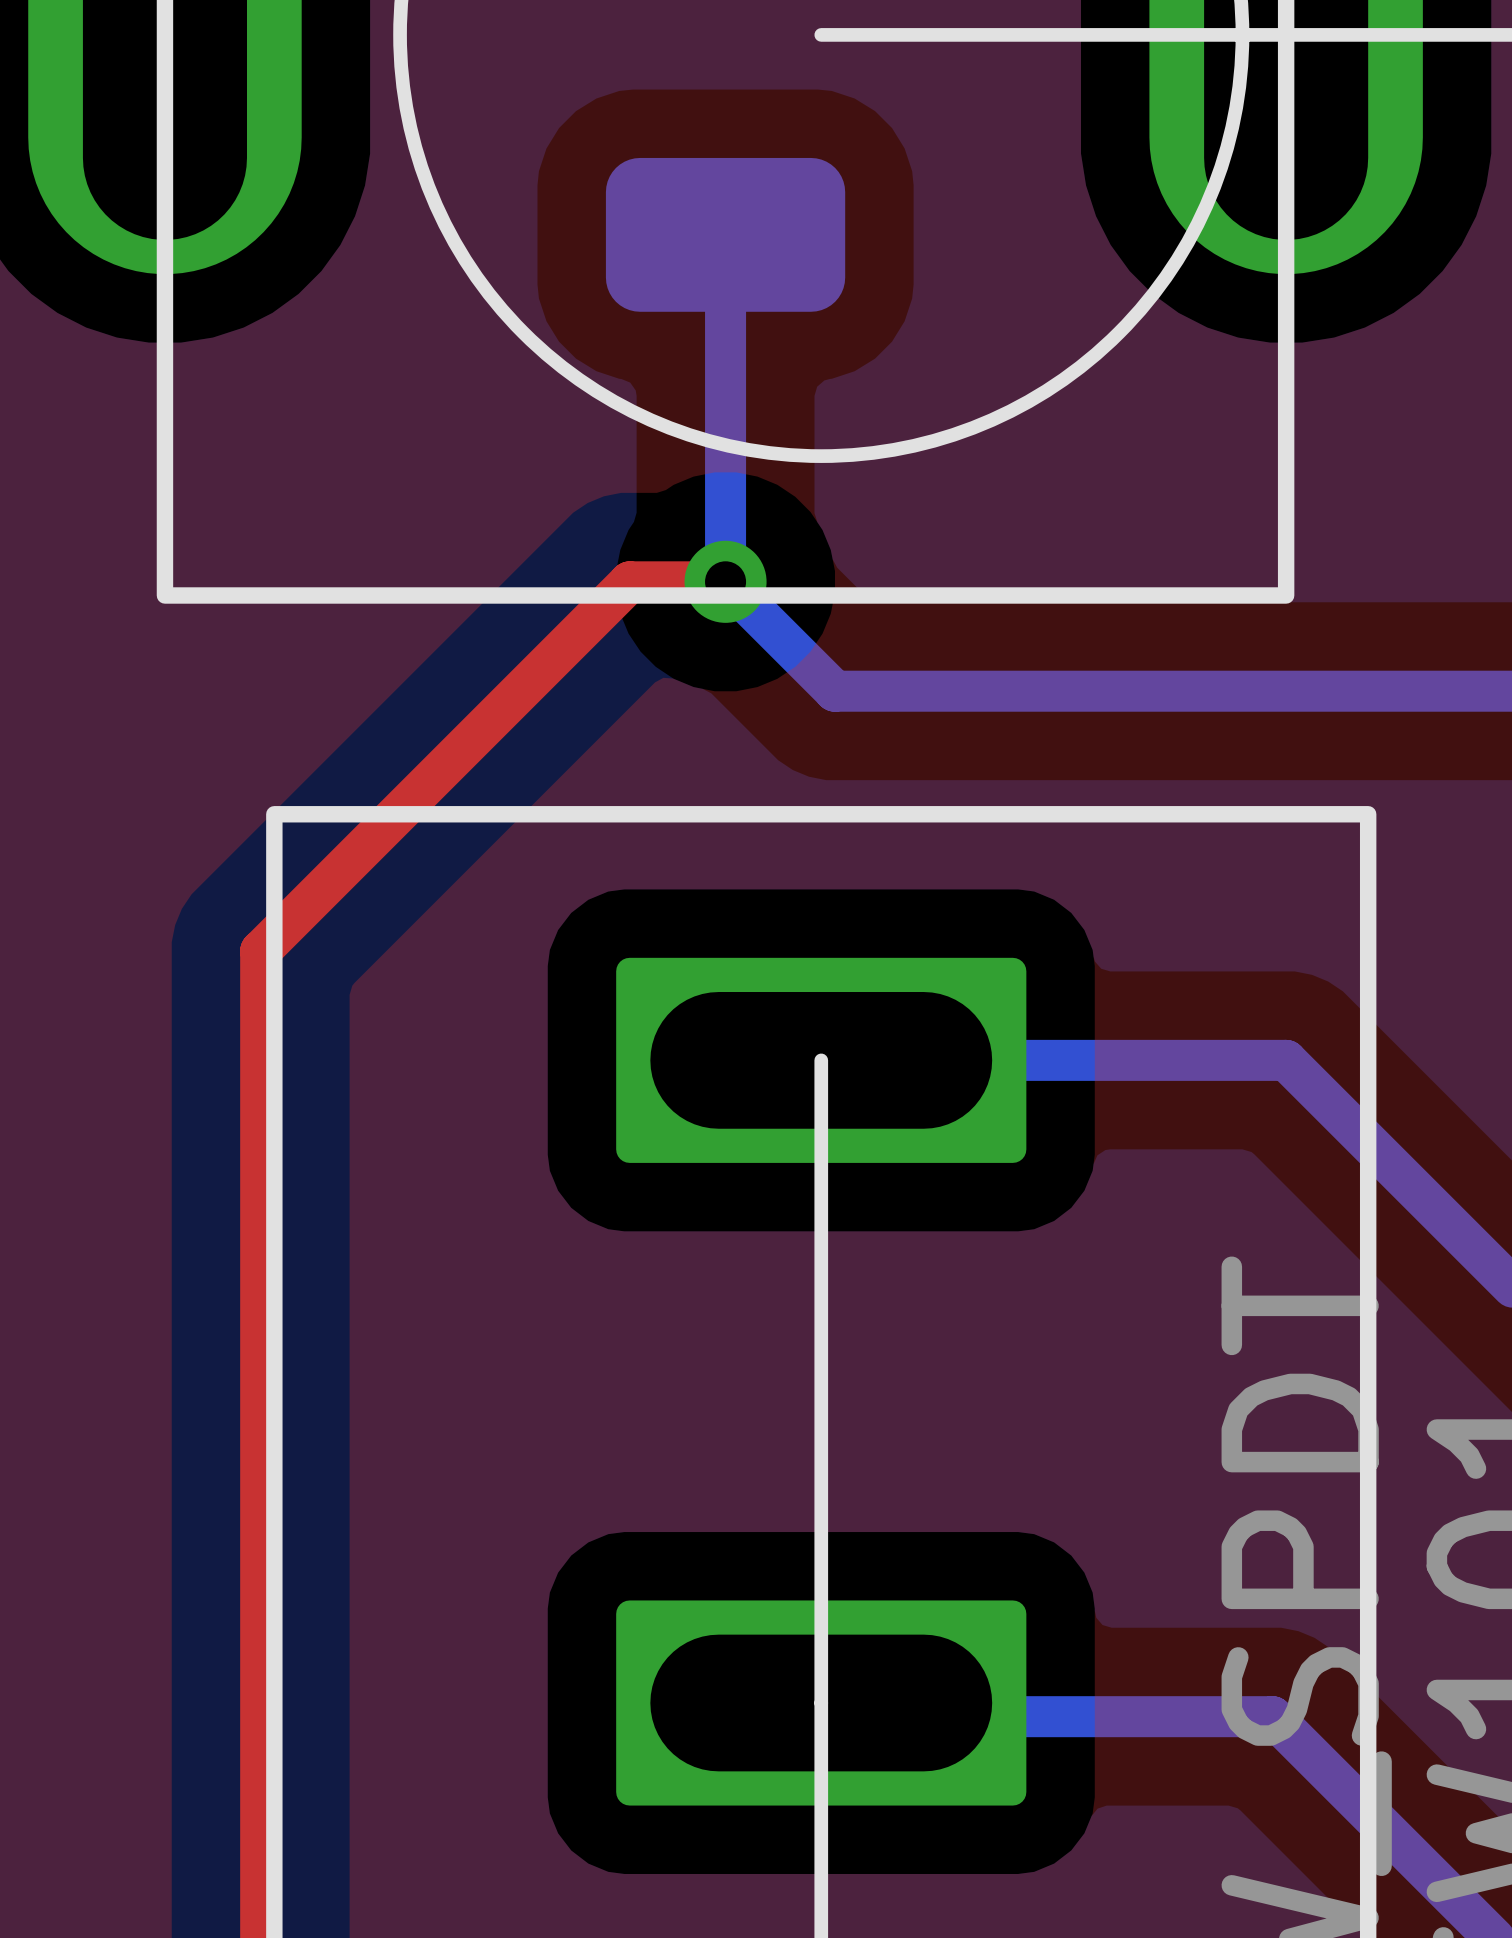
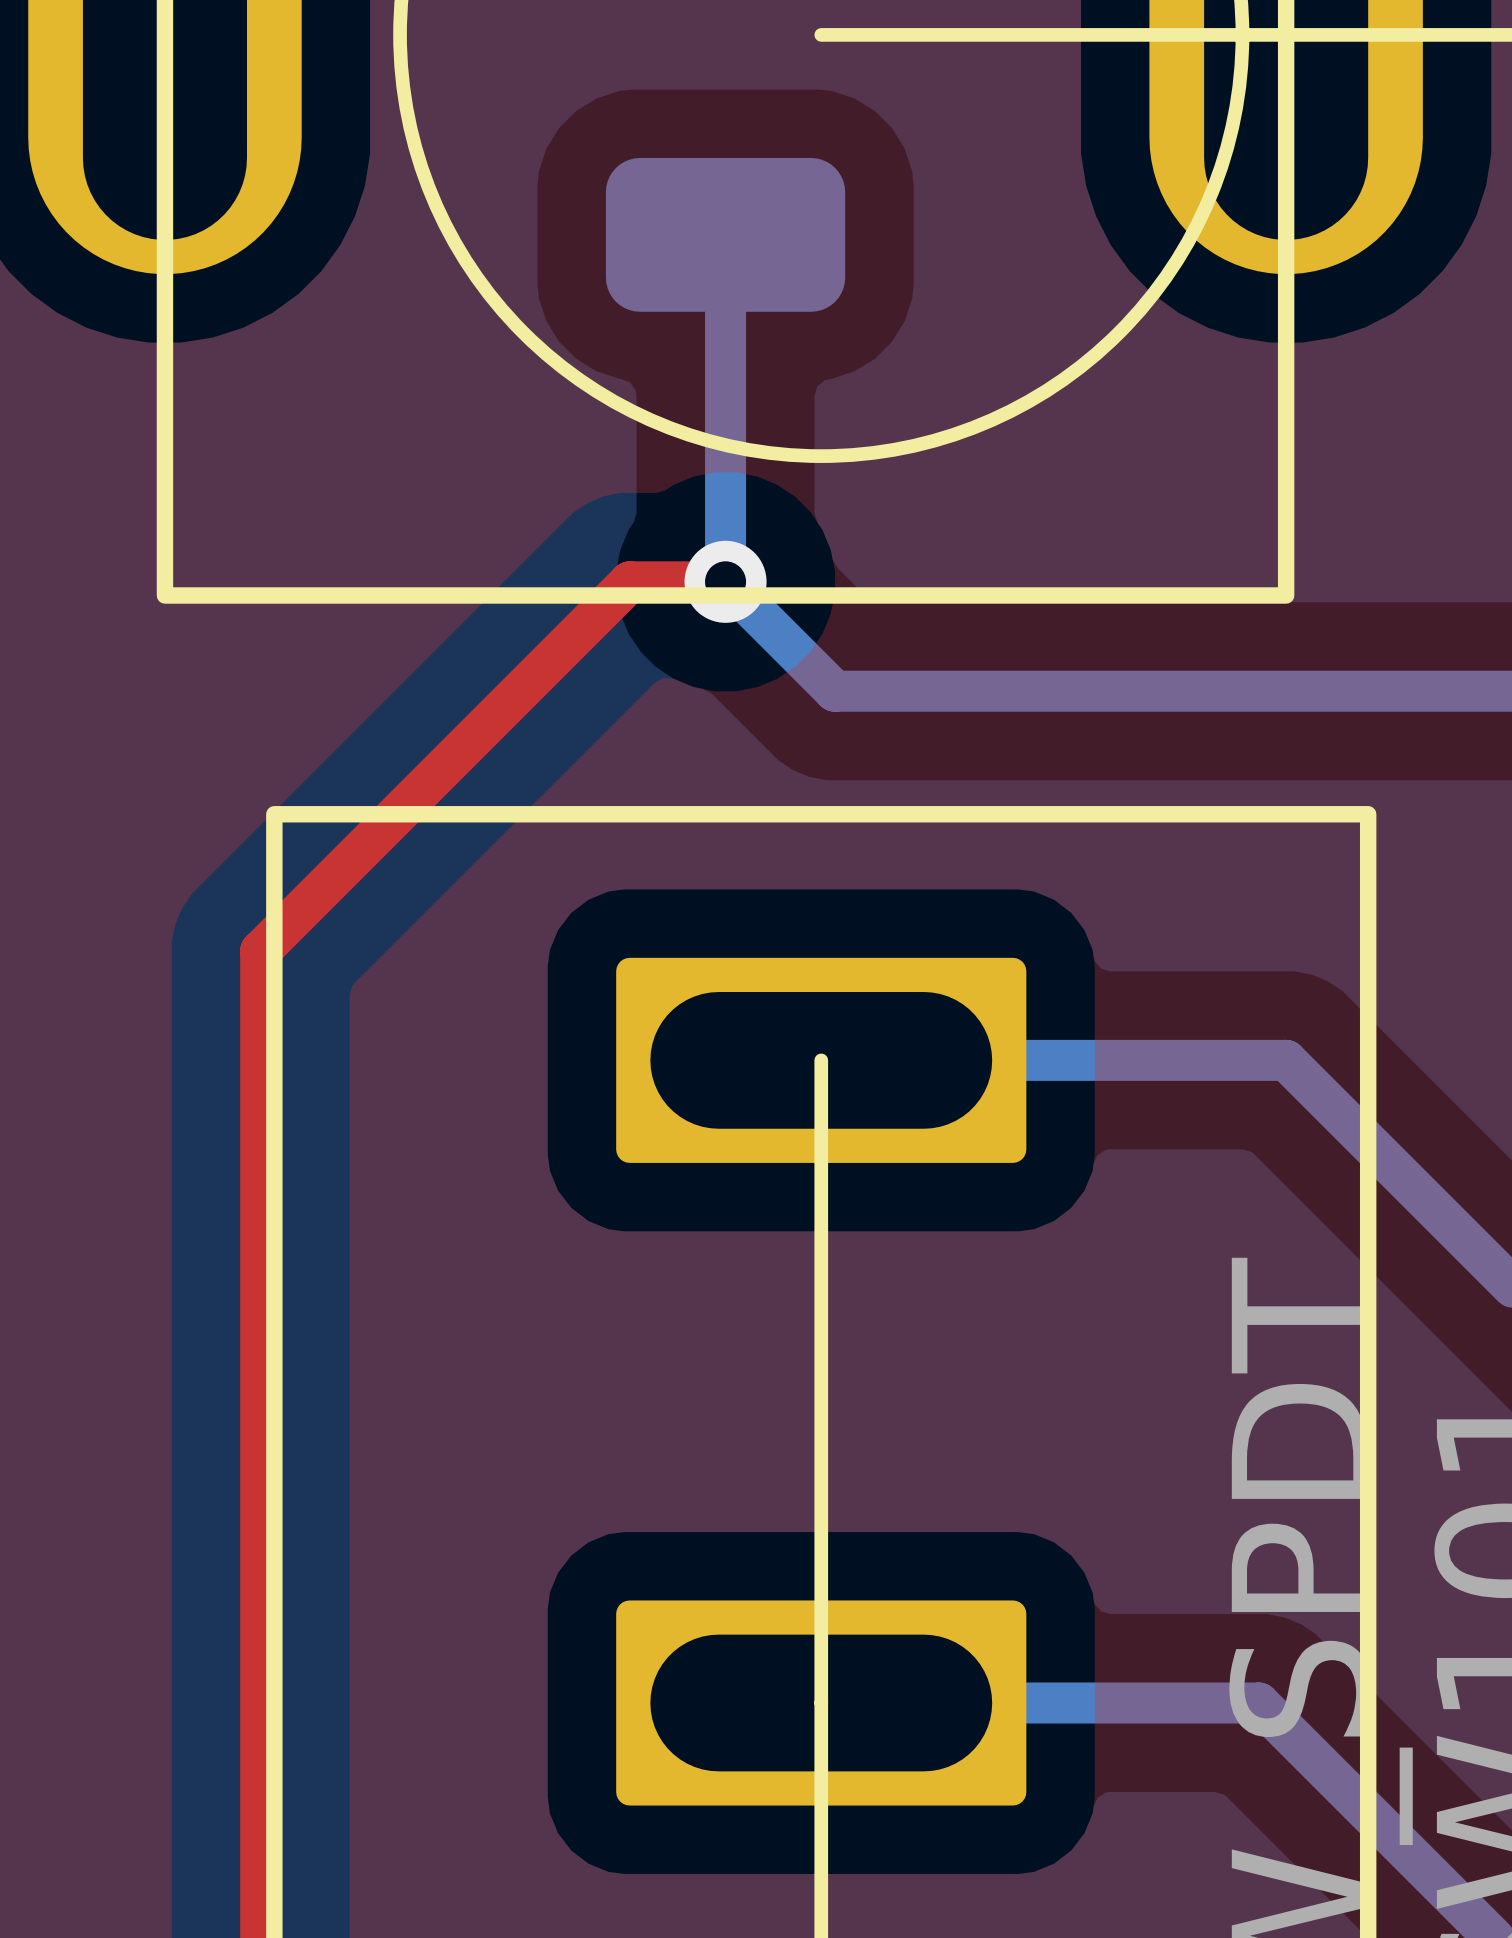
bottom track: (821, 1703) (834, 1716) (1272, 1716) -> (821, 1703) (1258, 1703) (1272, 1716)

